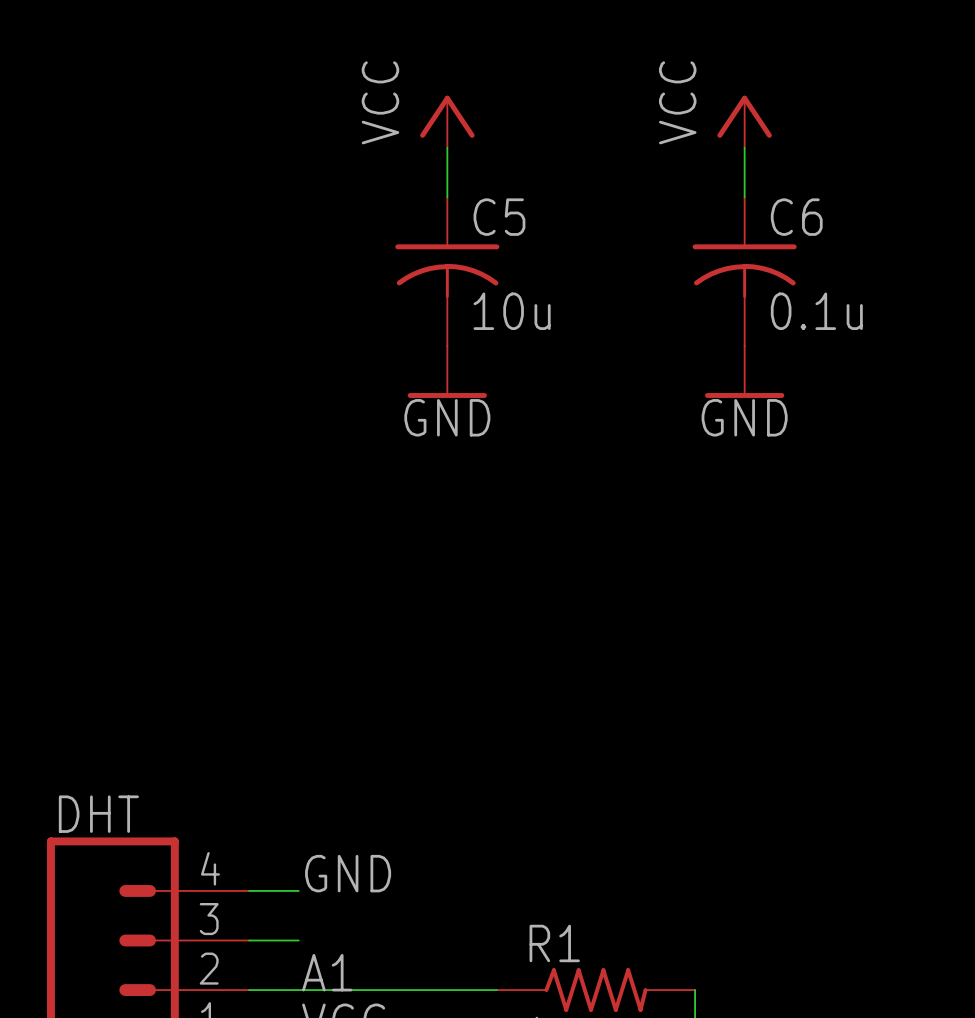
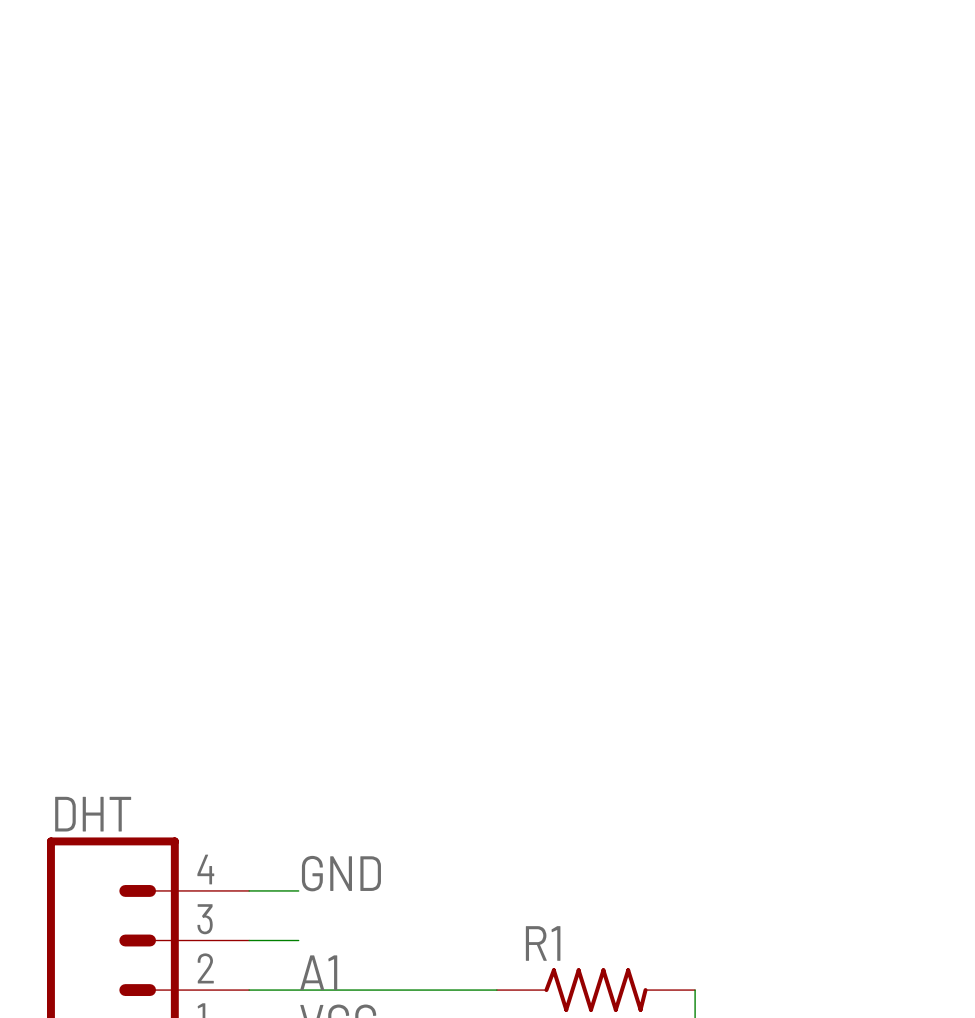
power symbol: VCC (447, 121) -> none
power symbol: VCC (744, 121) -> none
wire: (447, 147) (447, 197) -> none
wire: (744, 147) (744, 197) -> none
C5: 10u (447, 271) -> none
C6: 0.1u (744, 271) -> none
power symbol: GND (447, 371) -> none
power symbol: GND (744, 371) -> none

